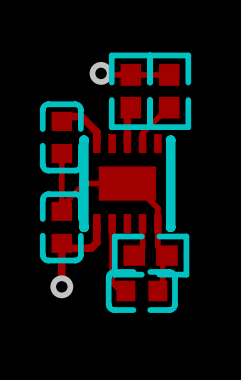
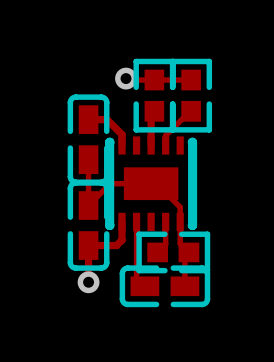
part footprint: [39, 101, 84, 174] -> [67, 94, 110, 185]
part footprint: [39, 191, 84, 264] -> [67, 180, 110, 271]
part footprint: [105, 269, 178, 313] -> [119, 265, 211, 308]

